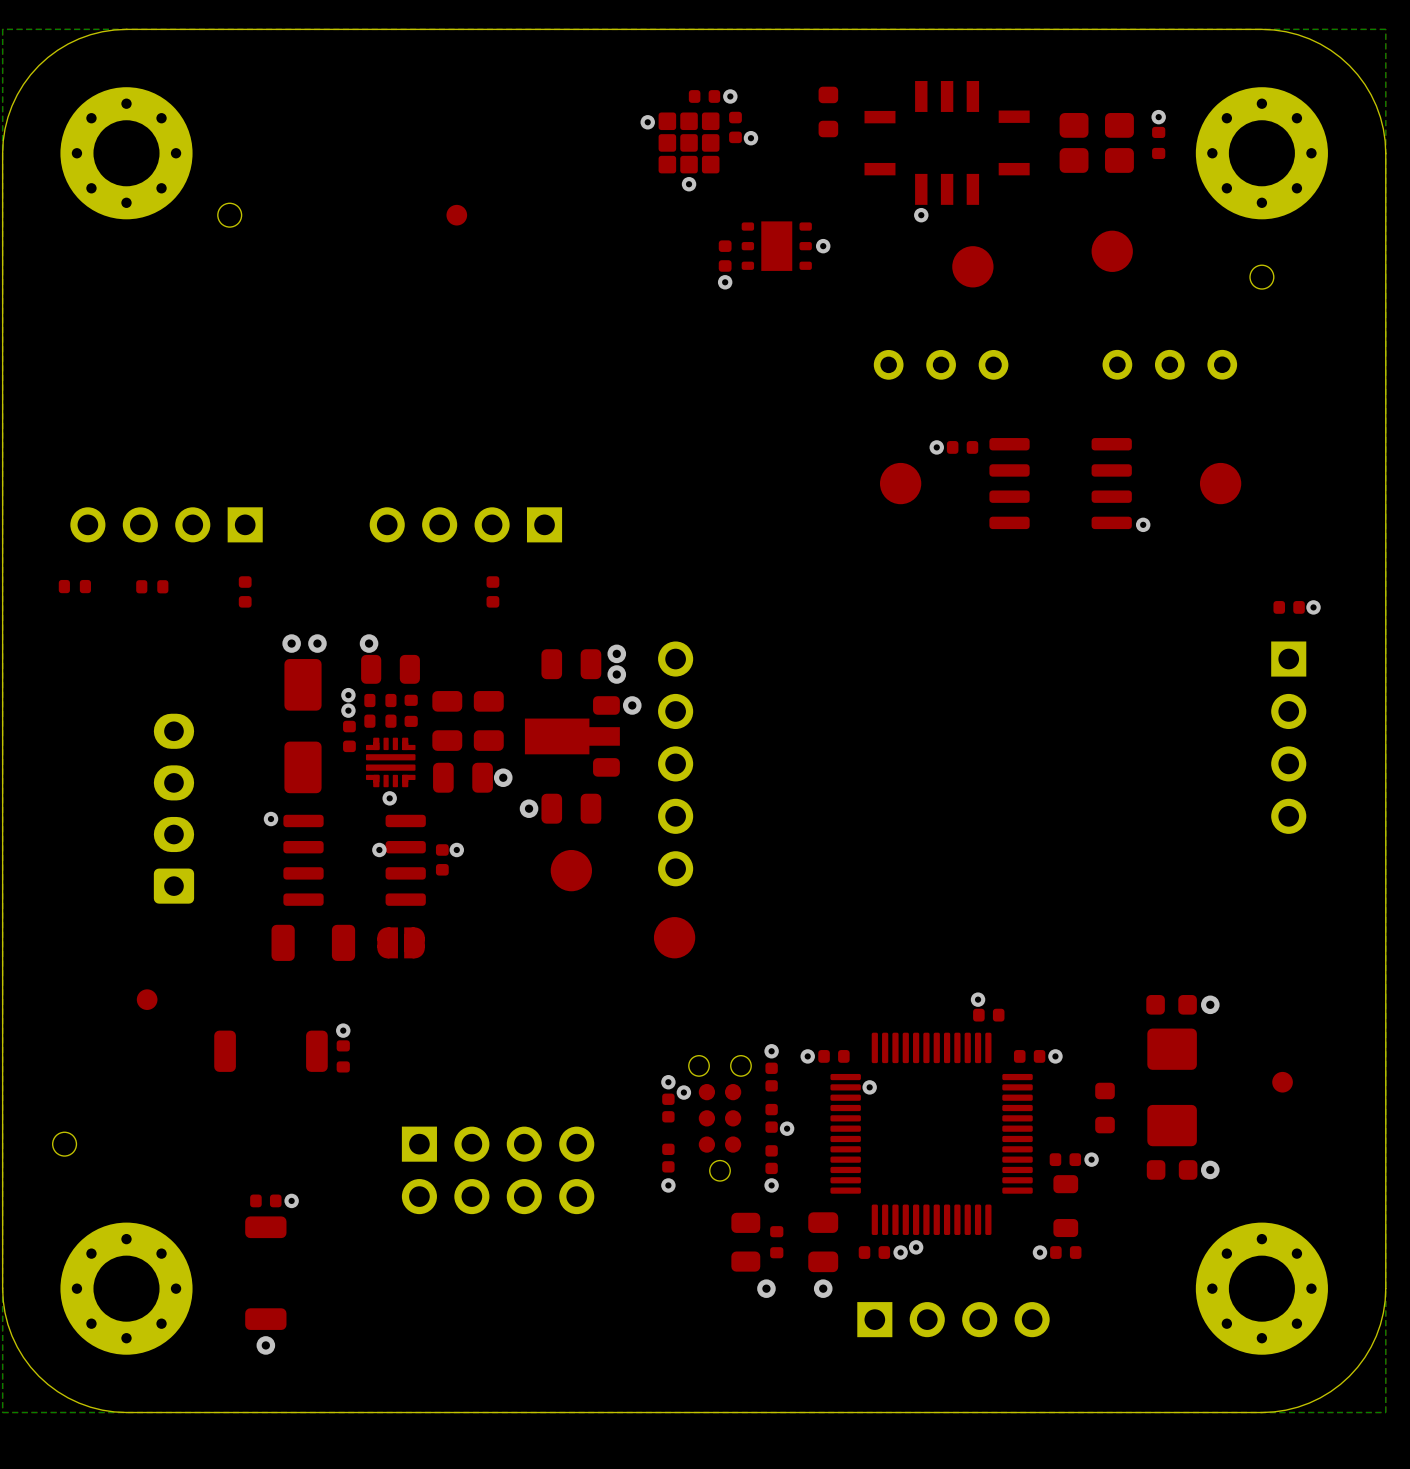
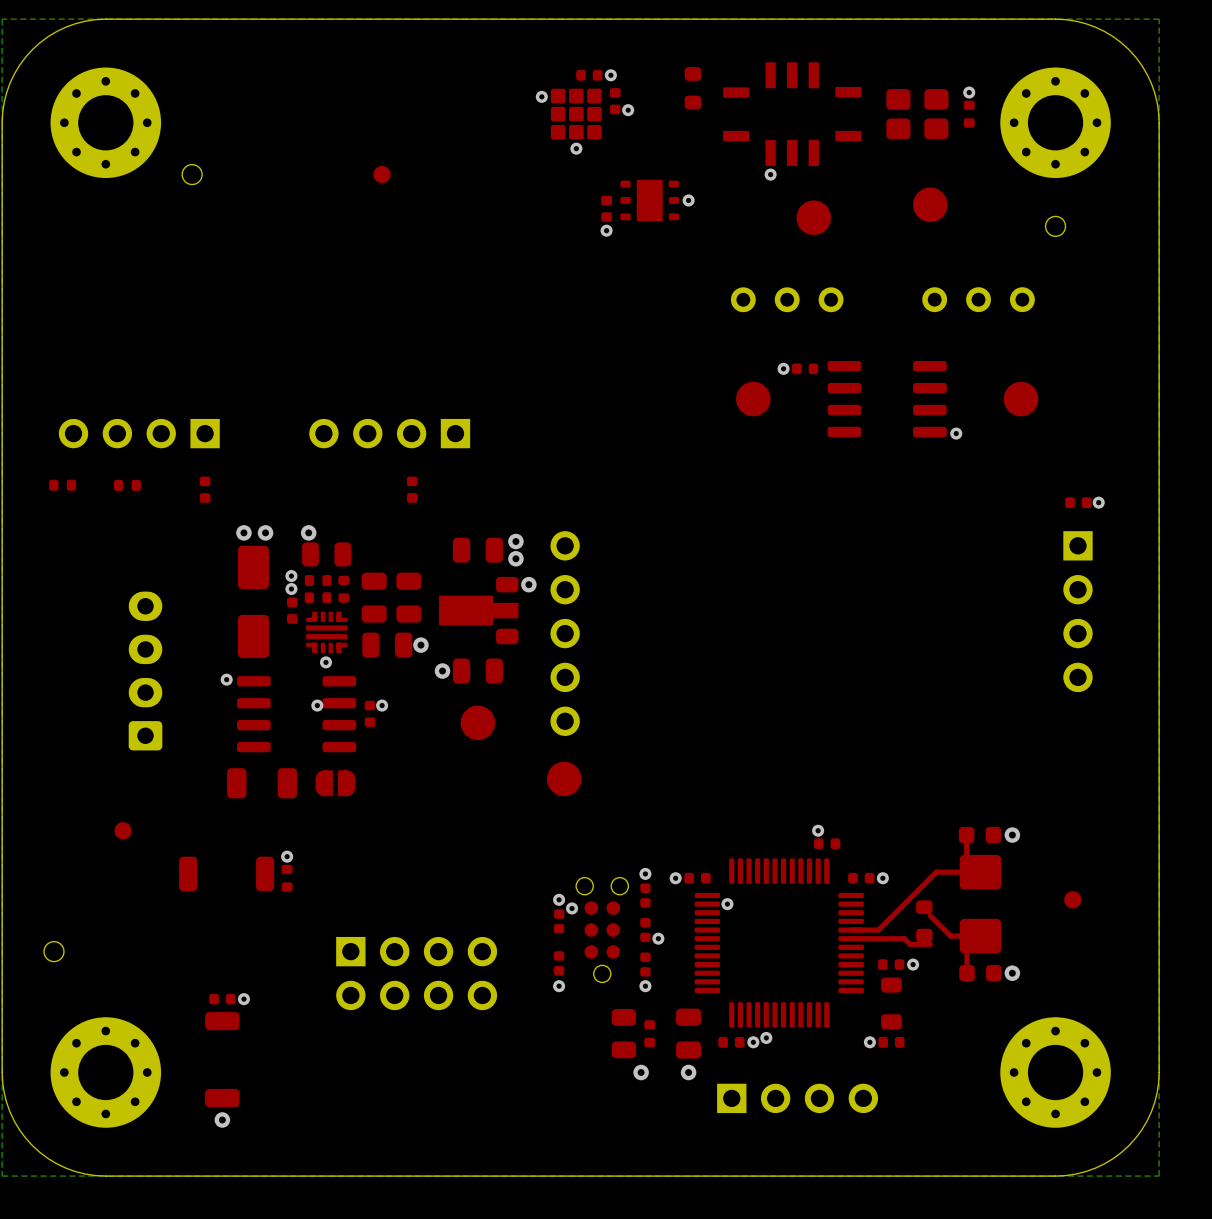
top track: none -> (966, 835) (966, 858) (980, 872) (936, 872) (878, 930) (851, 930)
top track: none -> (930, 915) (950, 936) (980, 936) (967, 949) (967, 973)
top track: none -> (851, 938) (904, 938) (910, 944) (930, 944)

